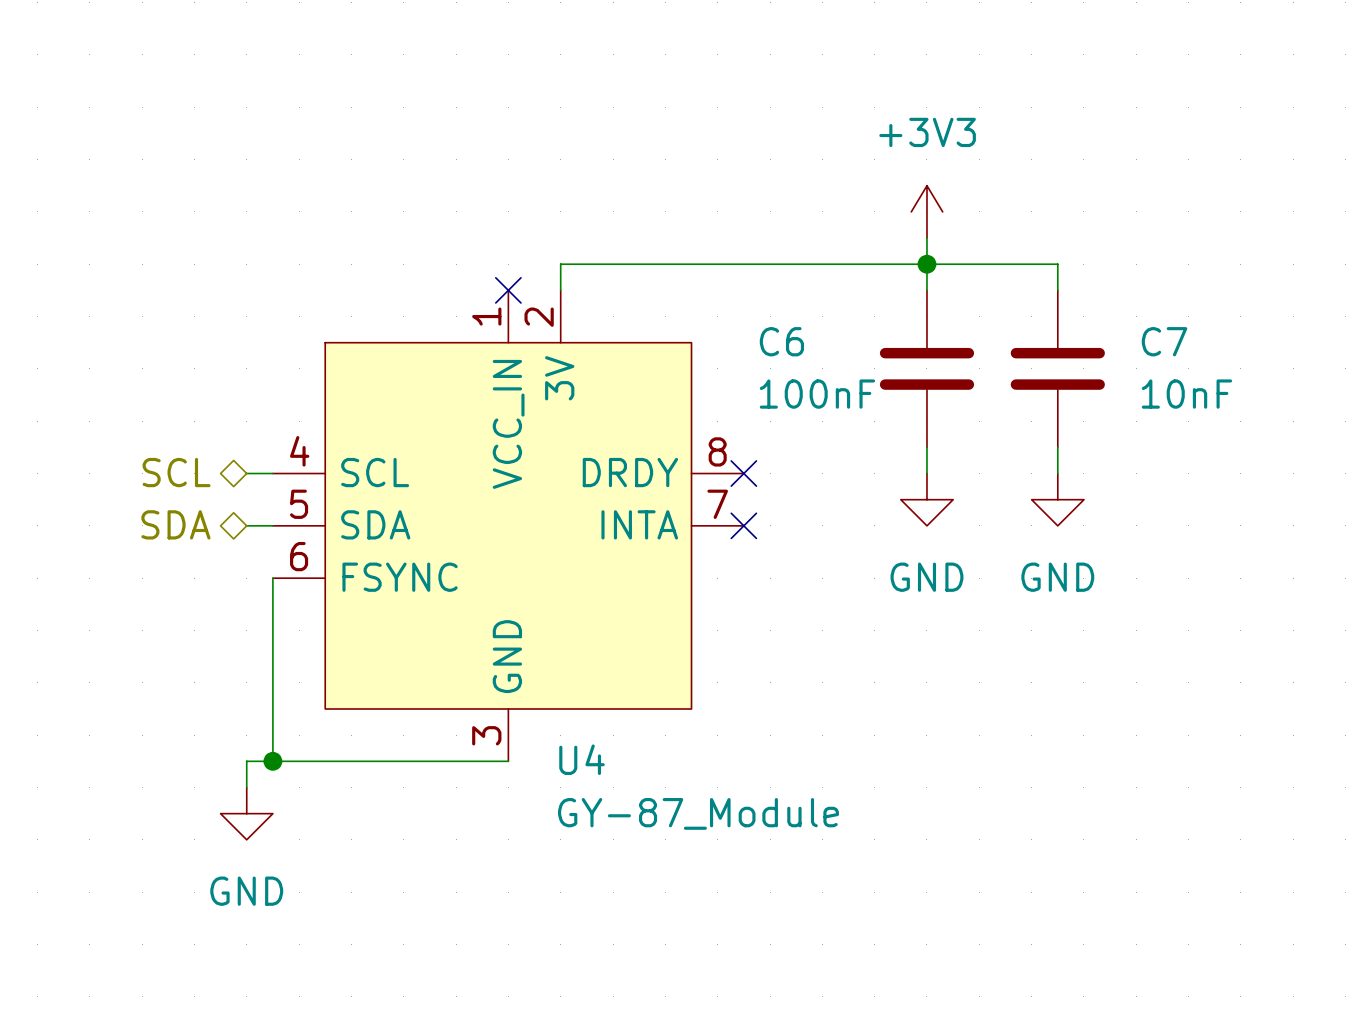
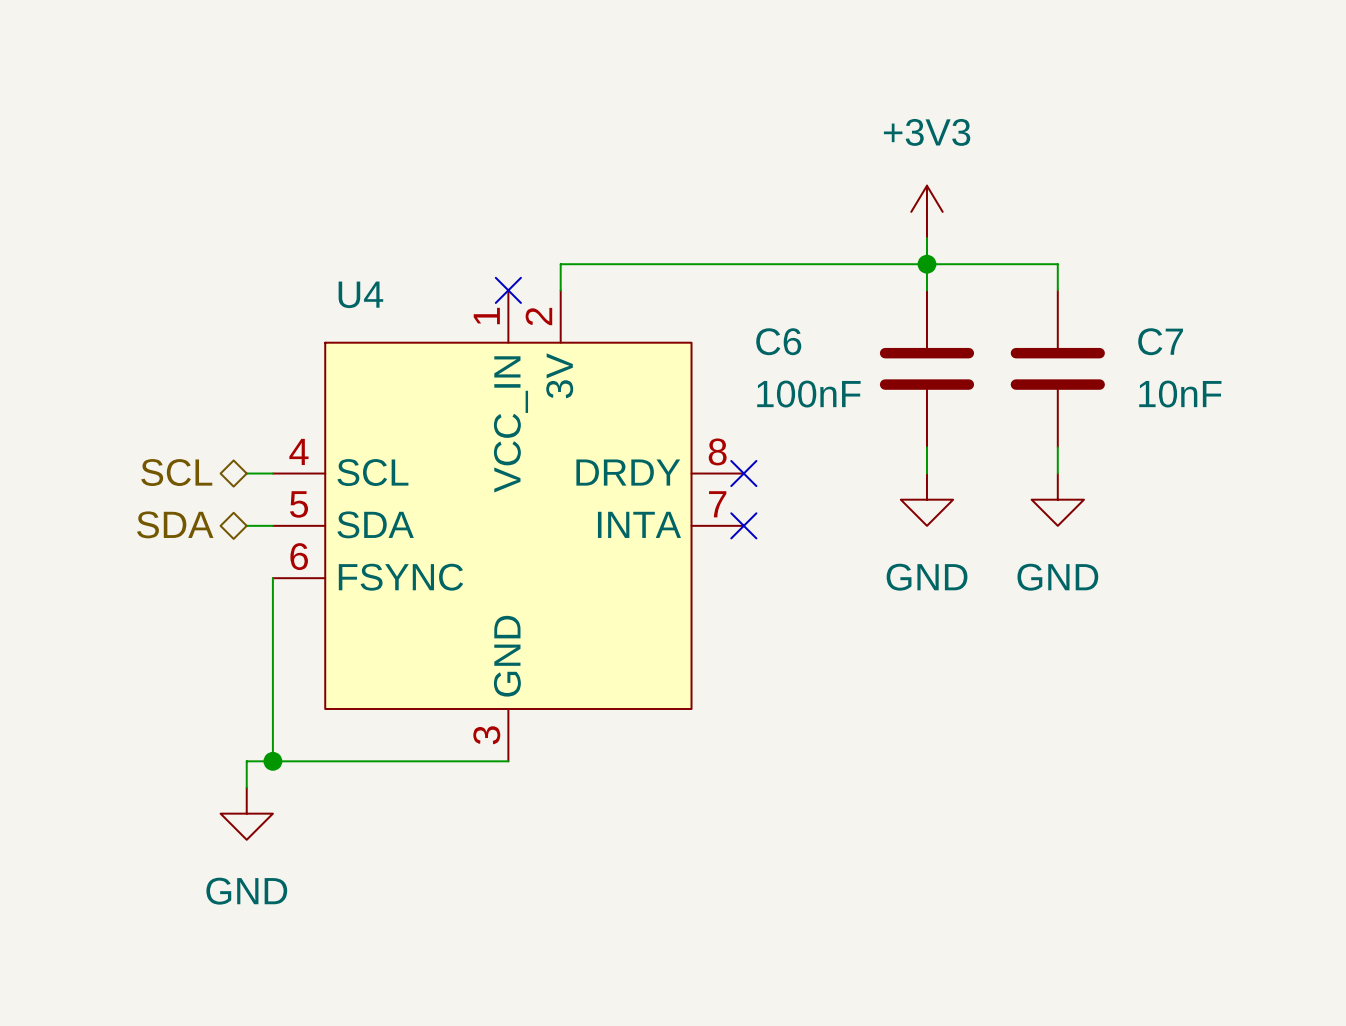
U4 name position: U4 (582, 759) -> U4 (360, 294)
U4 value: GY-87_Module (698, 813) -> none

